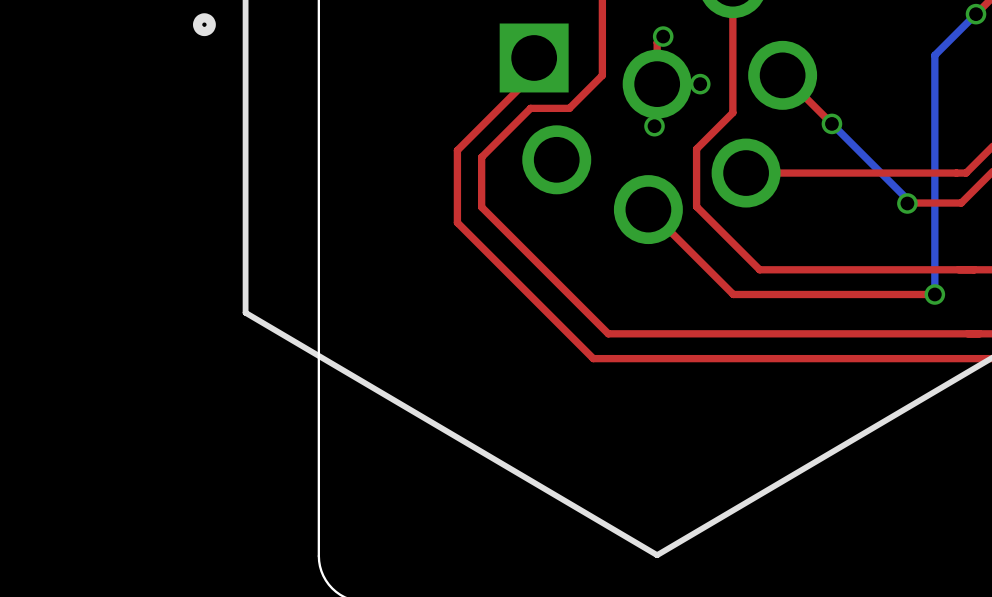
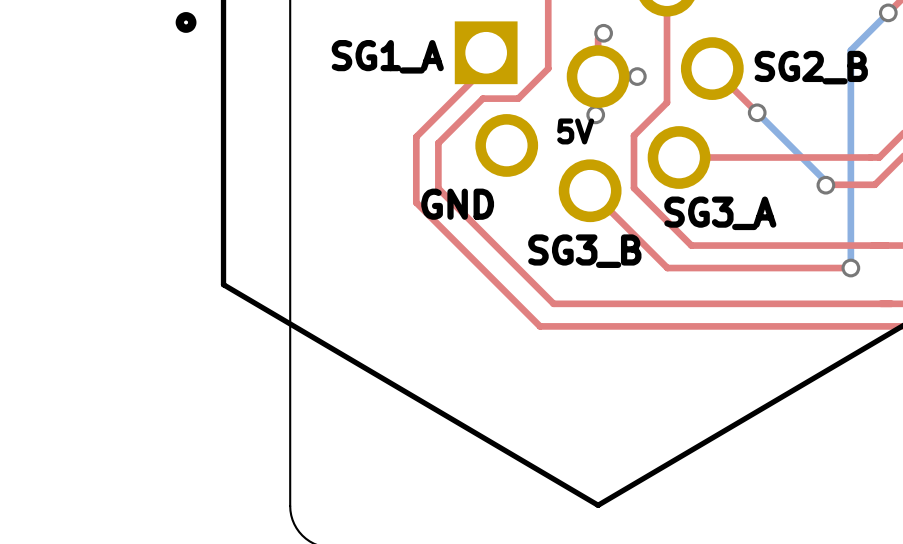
text: none -> SG1_A (387, 56)
text: none -> SG2_B (811, 67)
text: none -> 5V (575, 131)
text: none -> GND (457, 204)
text: none -> SG3_A (720, 213)
text: none -> SG3_B (584, 251)

